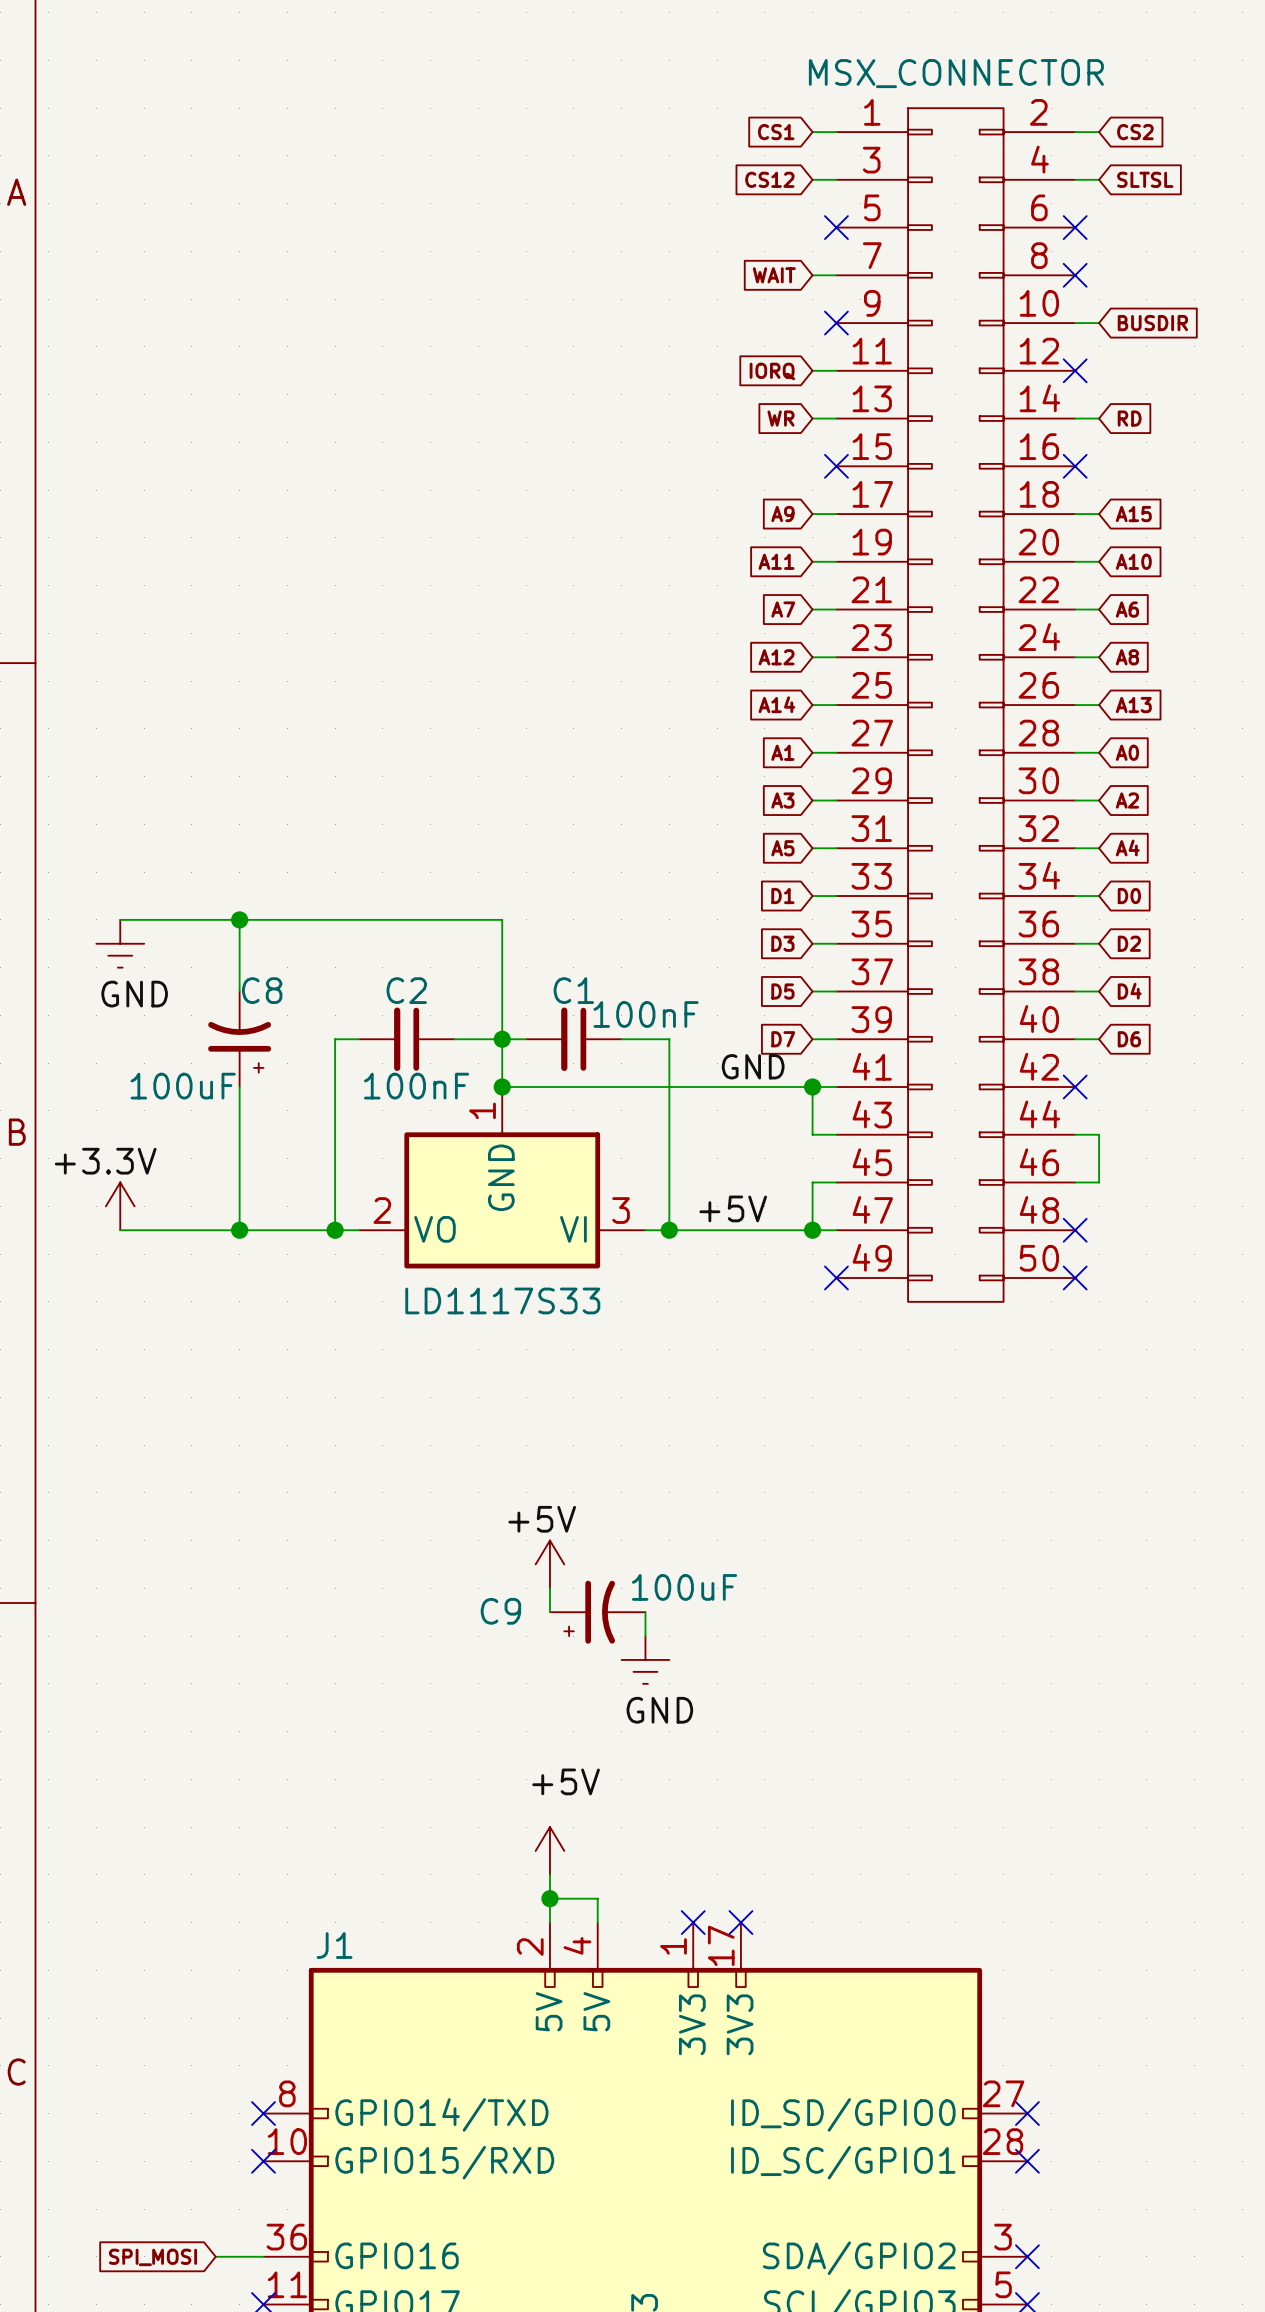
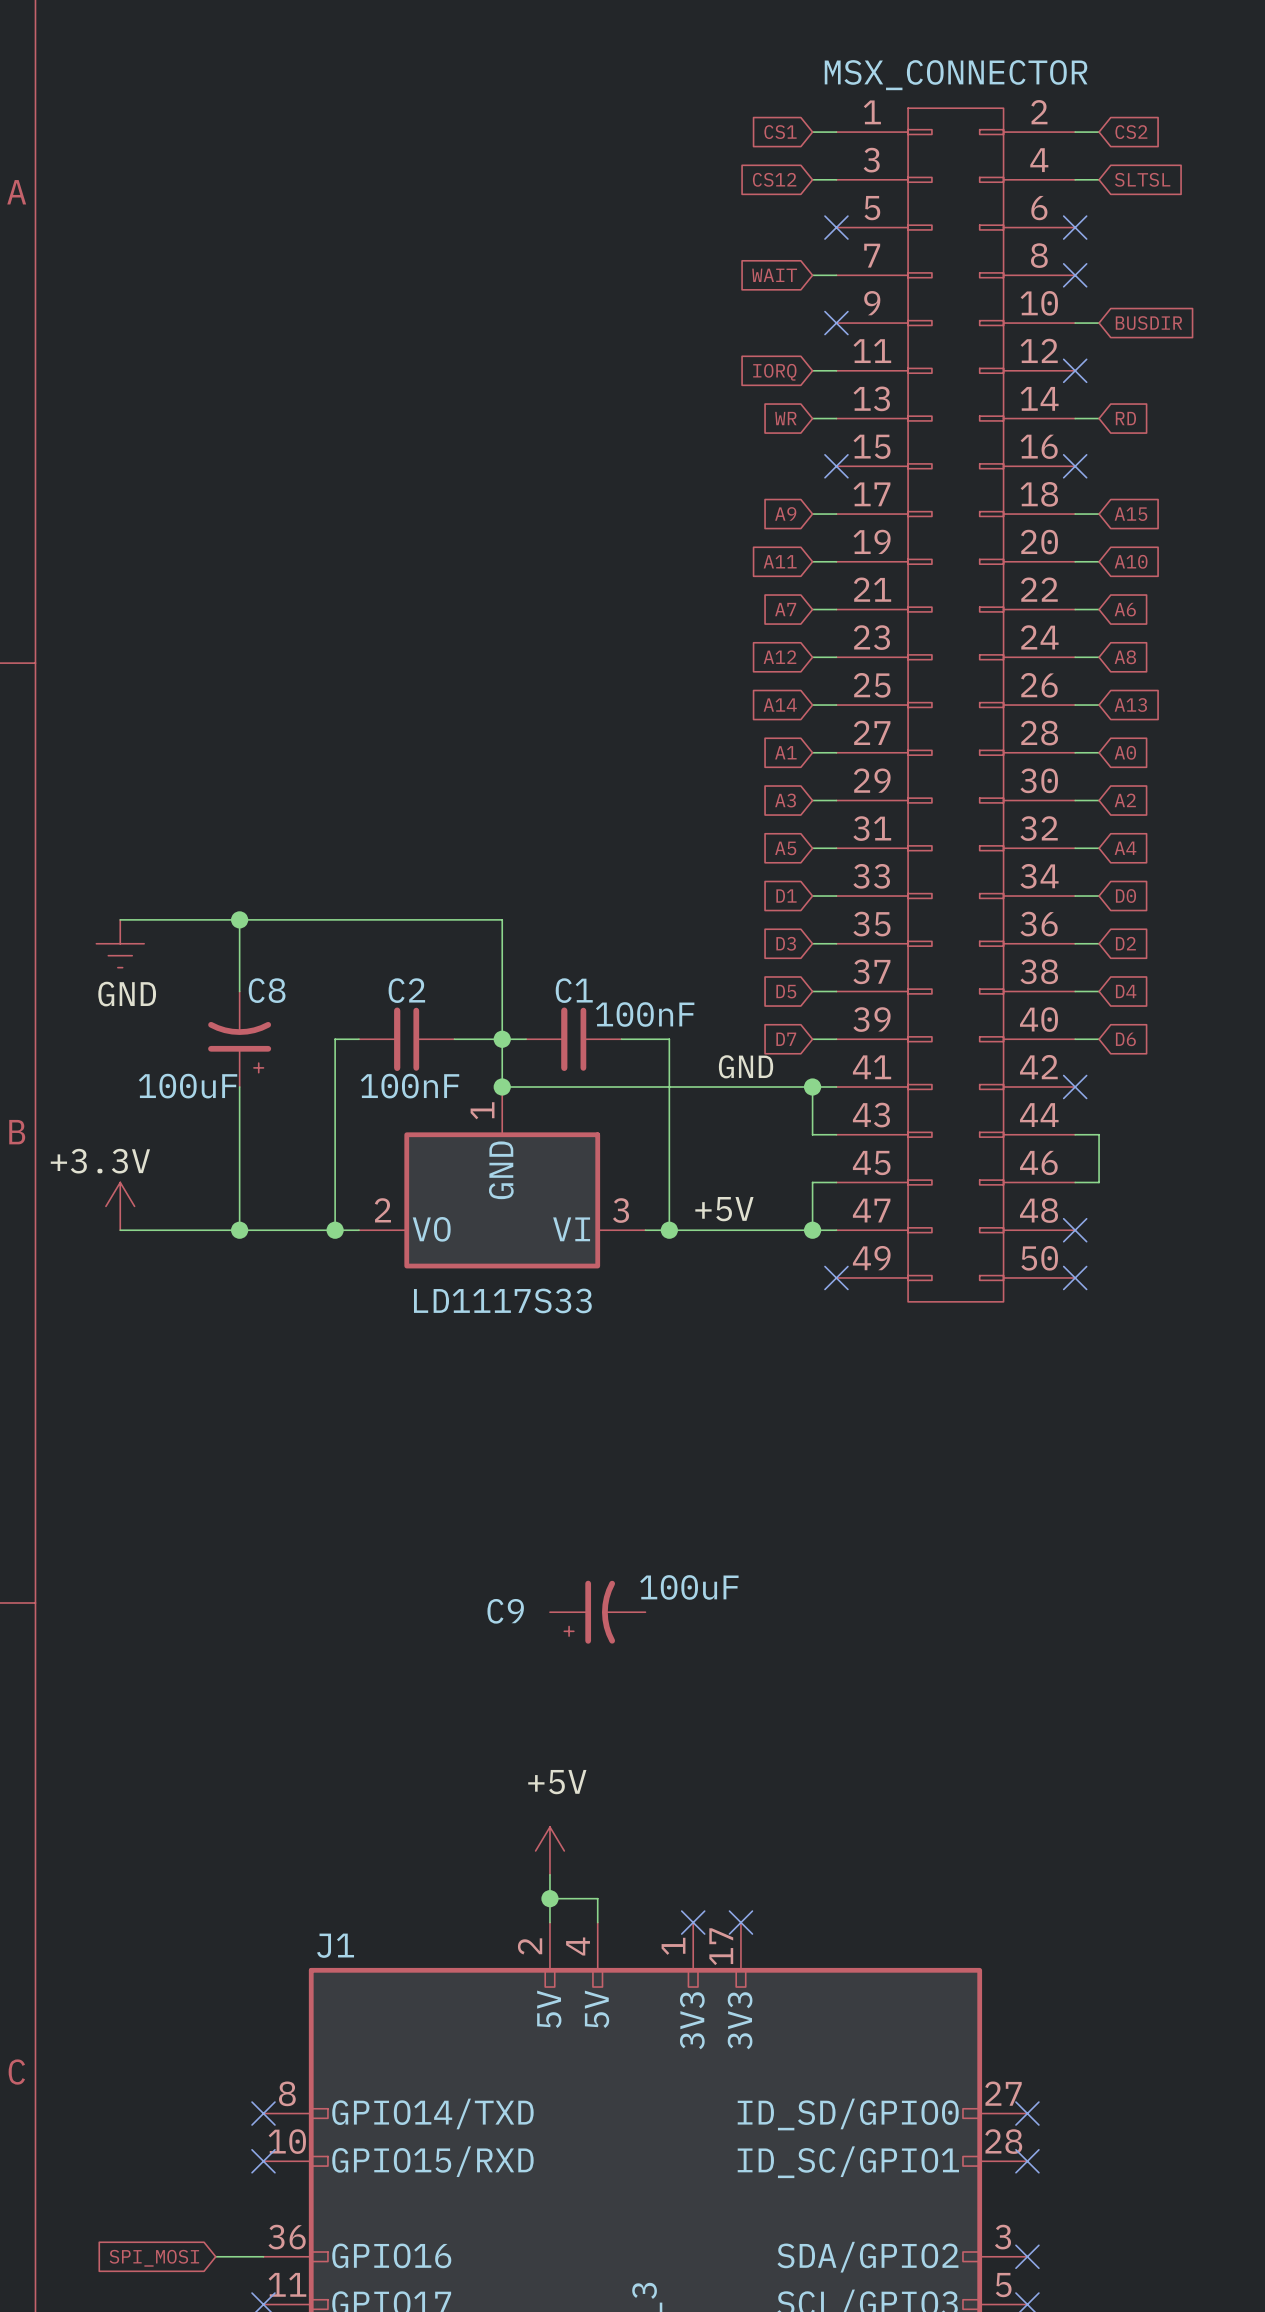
label: +5V (542, 1519) -> none
power symbol: (549, 1564) -> none
wire: (549, 1588) (549, 1612) -> none
wire: (645, 1612) (645, 1636) -> none
power symbol: (645, 1659) -> none
label: GND (659, 1710) -> none

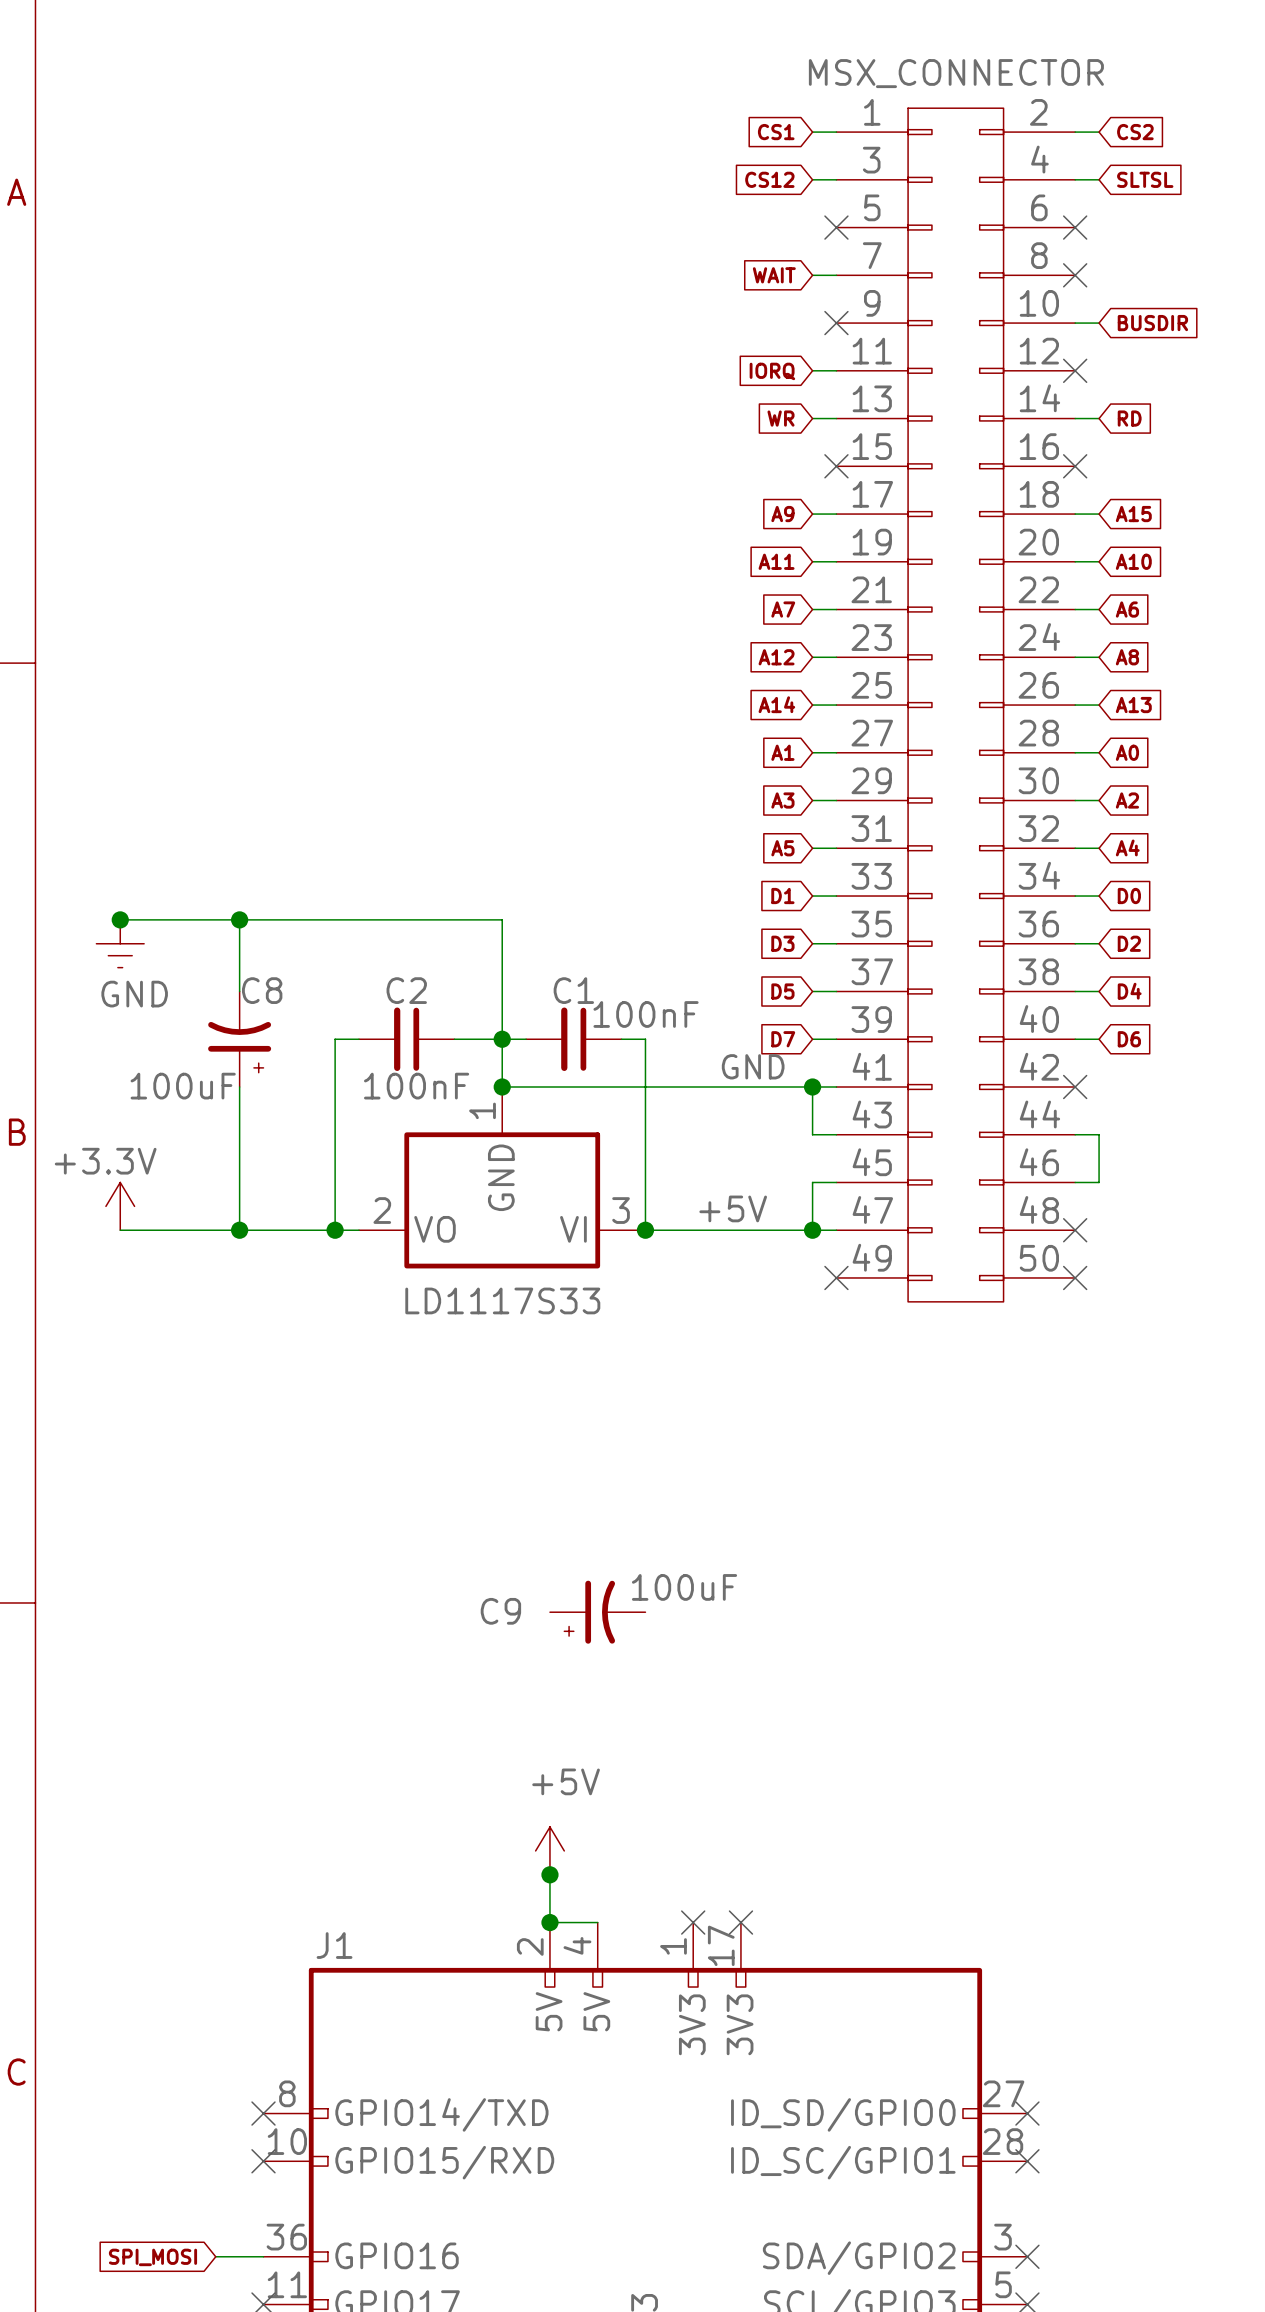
junction: none -> (120, 919)
wire: (645, 1039) (669, 1039) (669, 1230) -> (645, 1039) (645, 1230)
junction position: (669, 1230) -> (645, 1230)
junction: none -> (549, 1874)
wire: (549, 1898) (597, 1898) (597, 1922) -> (549, 1922) (597, 1922)
junction: (549, 1898) -> none
junction: none -> (549, 1922)

